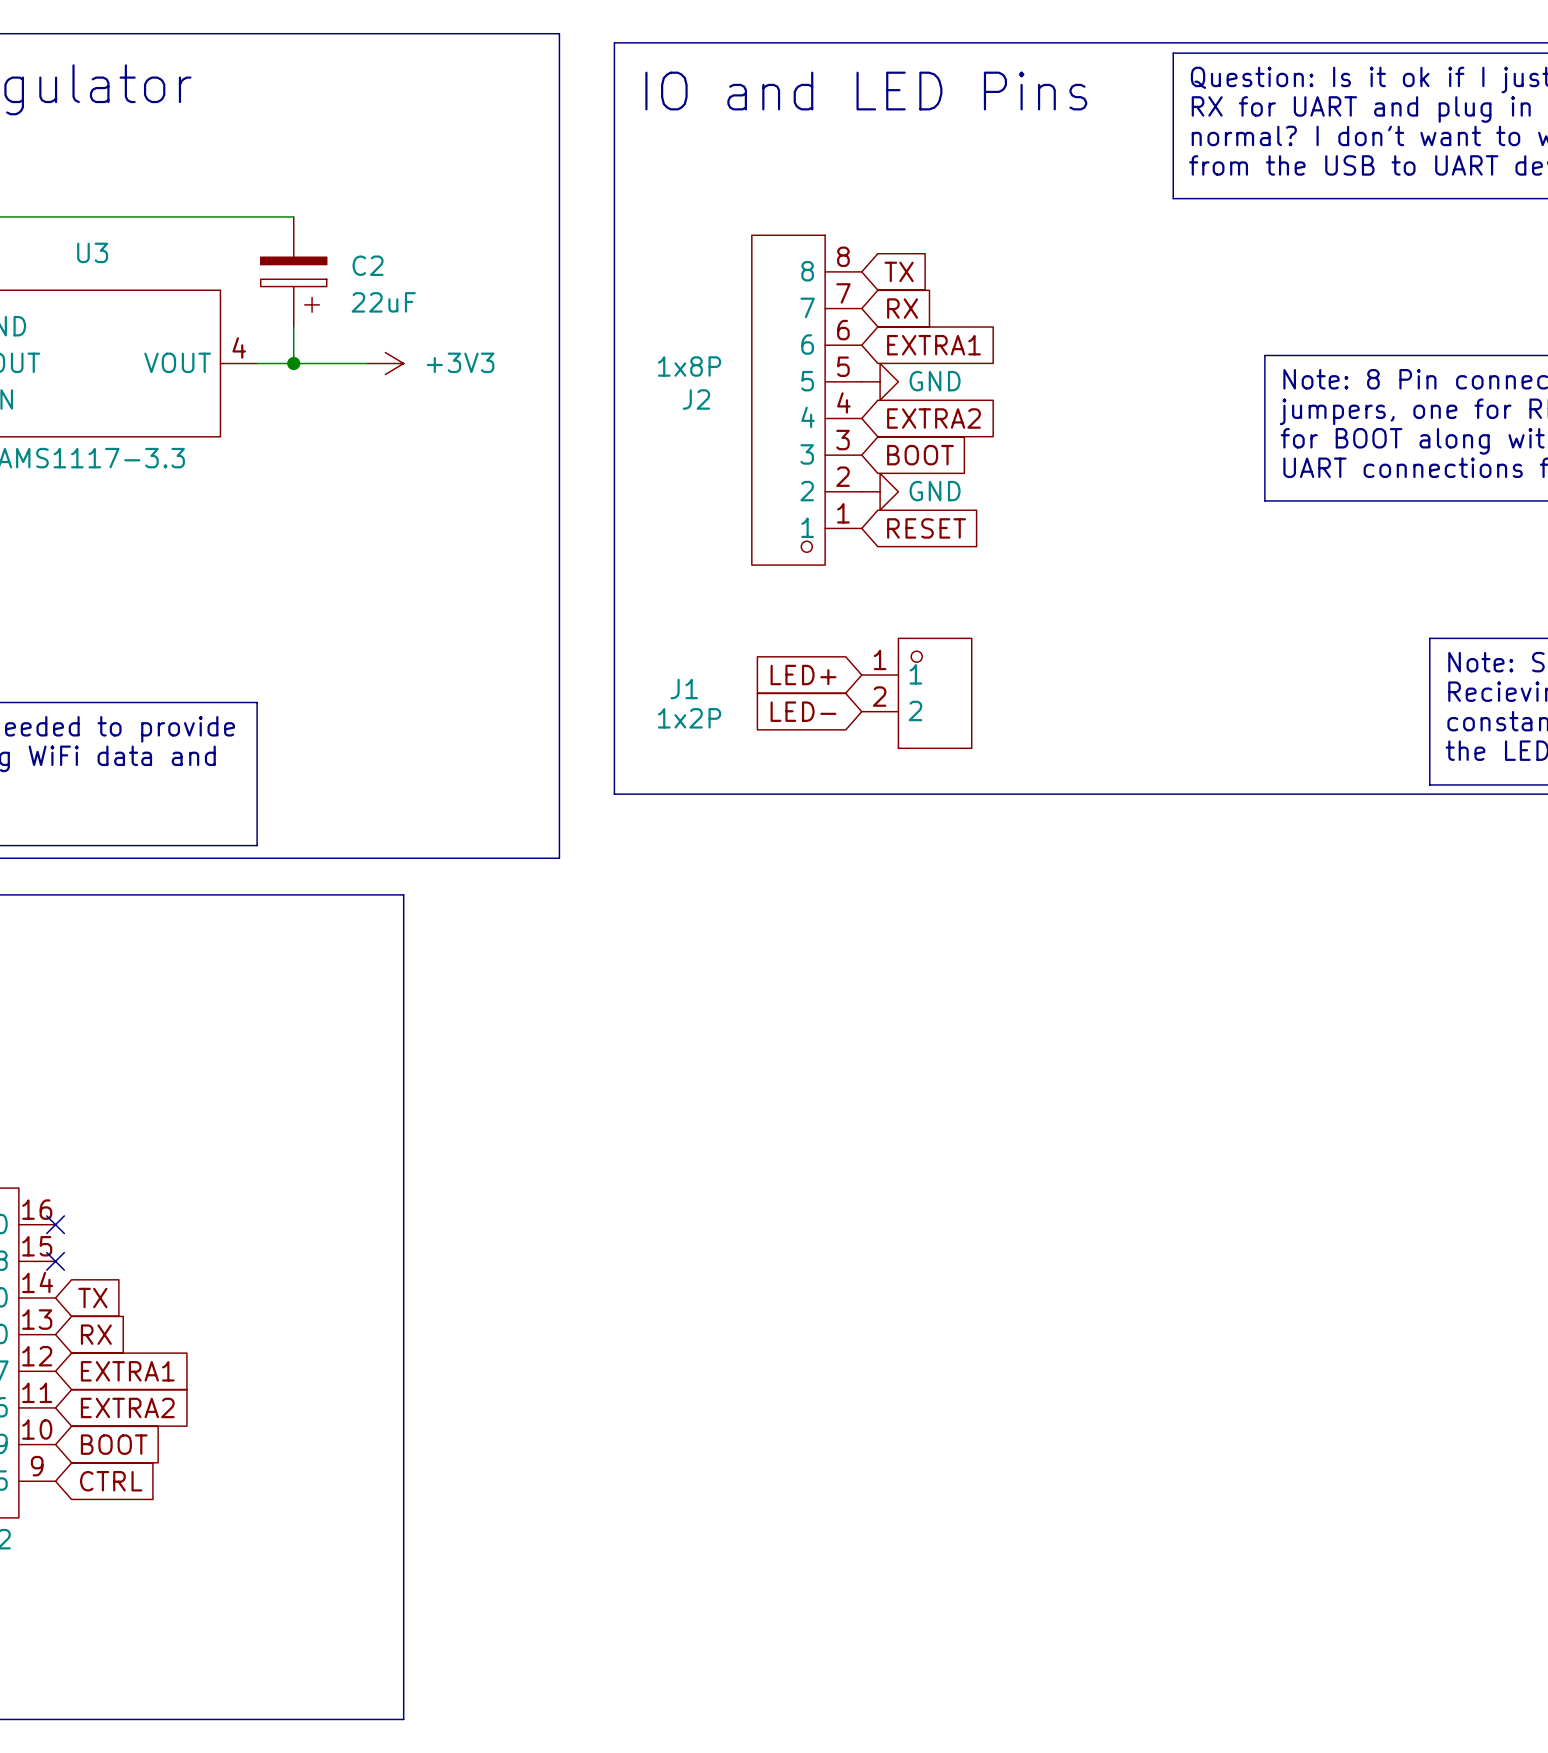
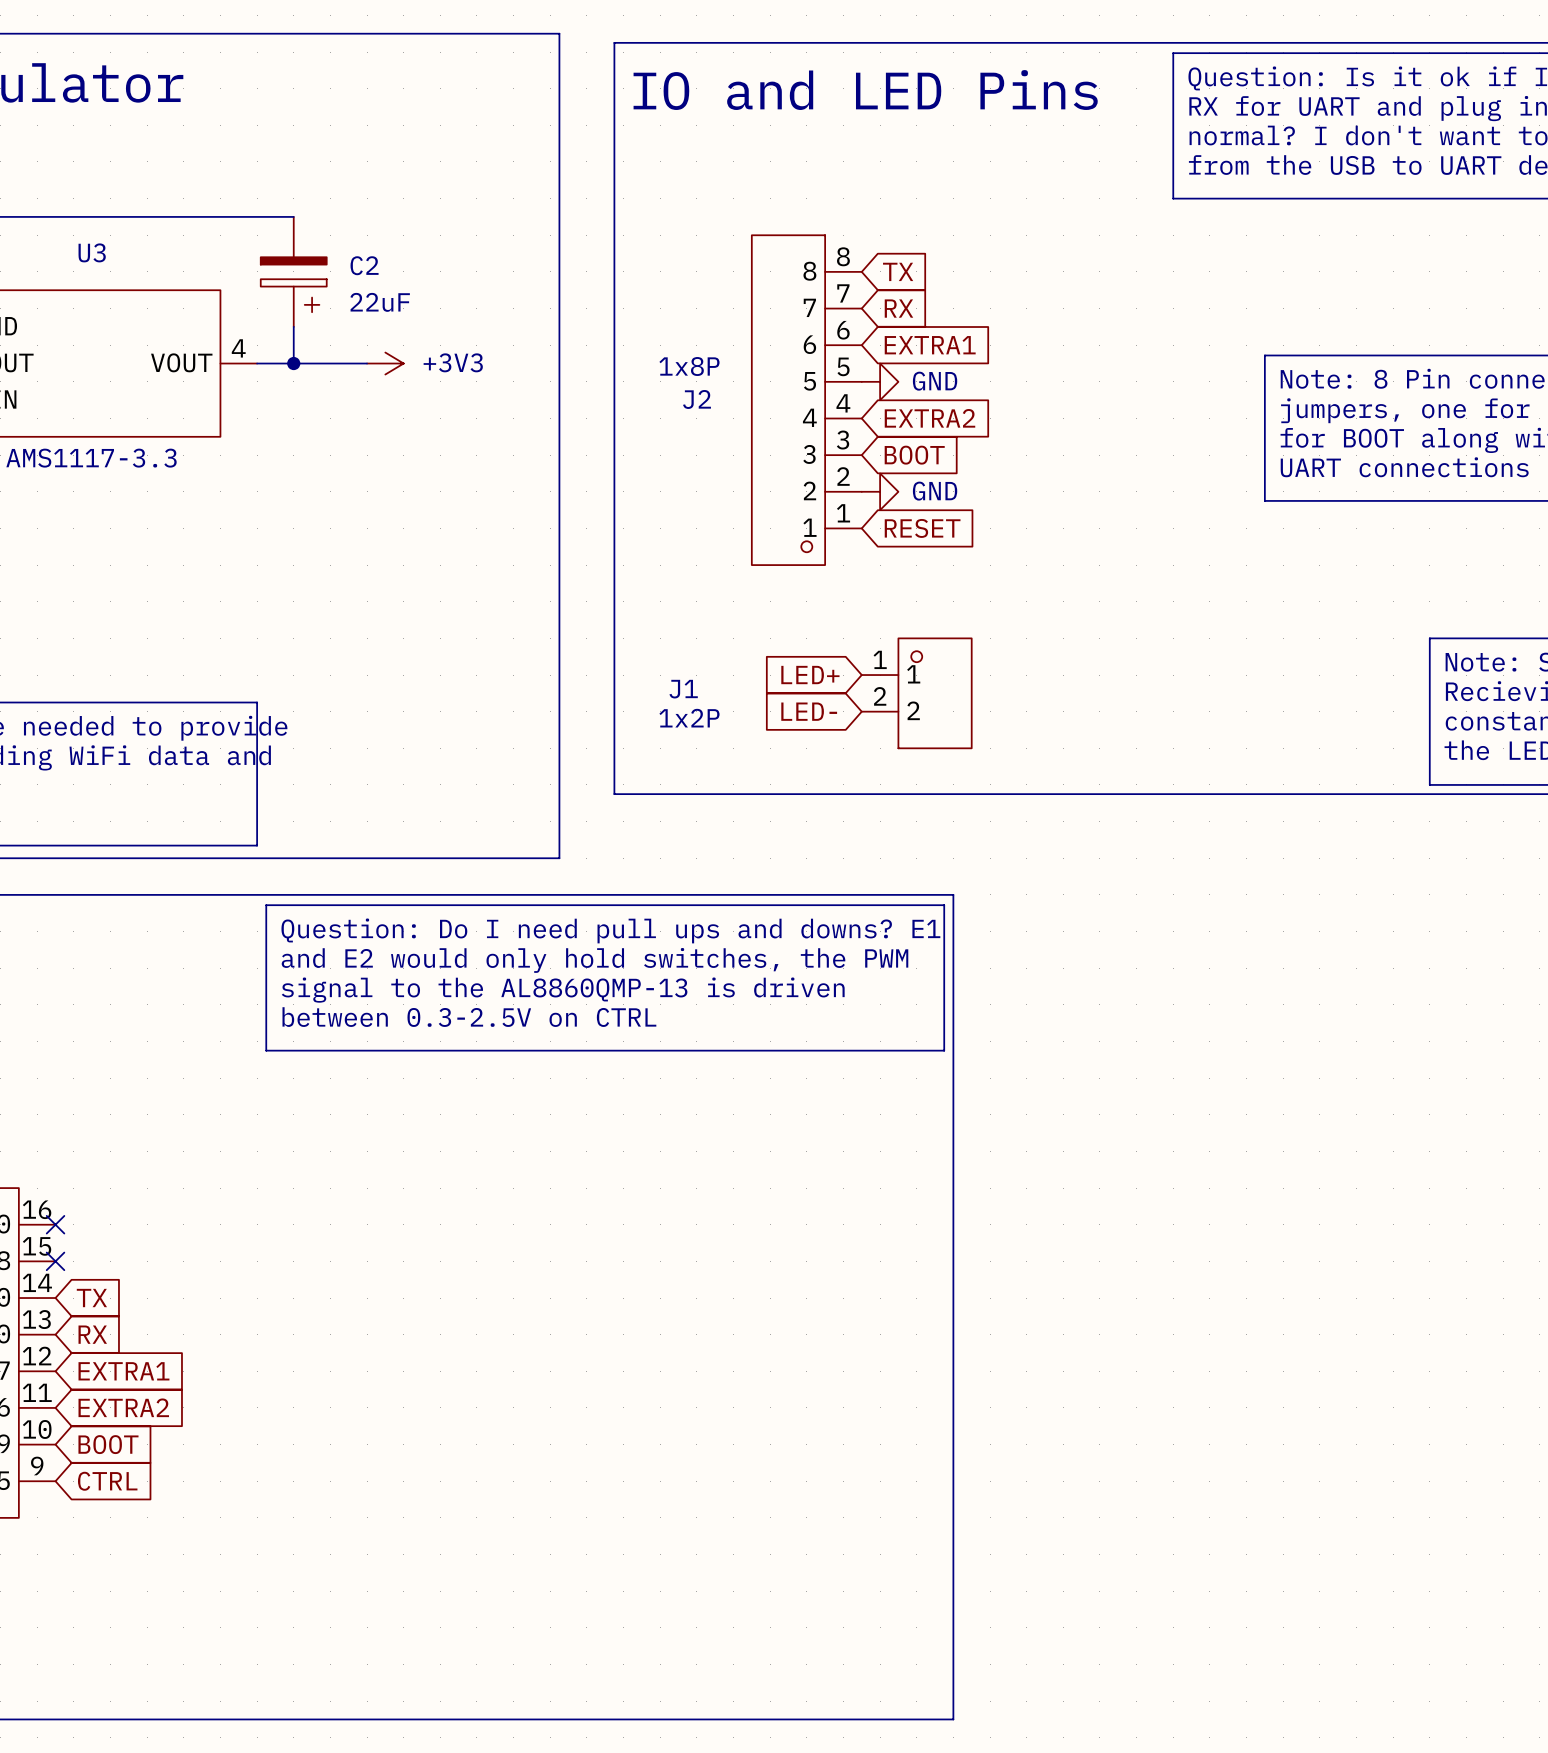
line: (403, 894) (403, 1719) -> (403, 894) (953, 894) (953, 1719) (403, 1719)
line: none -> (266, 905) (944, 905) (944, 1050) (266, 1050) (266, 905)
text: none -> Question: Do I need pull ups and downs? E1 (610, 930)
text: none -> and E2 would only hold switches, the PWM (595, 960)
text: none -> signal to the AL8860QMP-13 is driven (563, 990)
text: none -> between 0.3-2.5V on CTRL (469, 1017)

